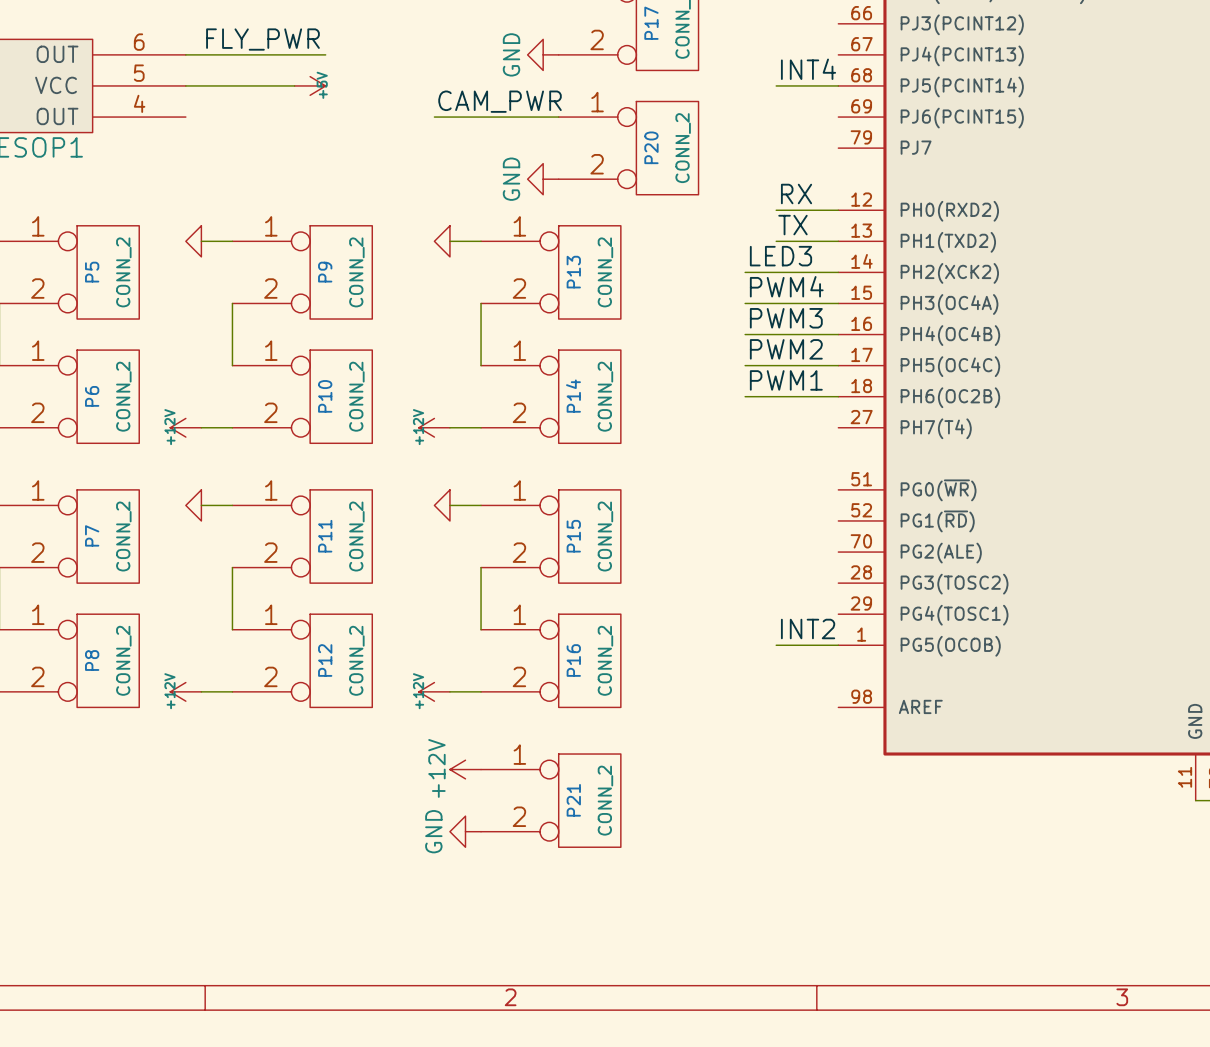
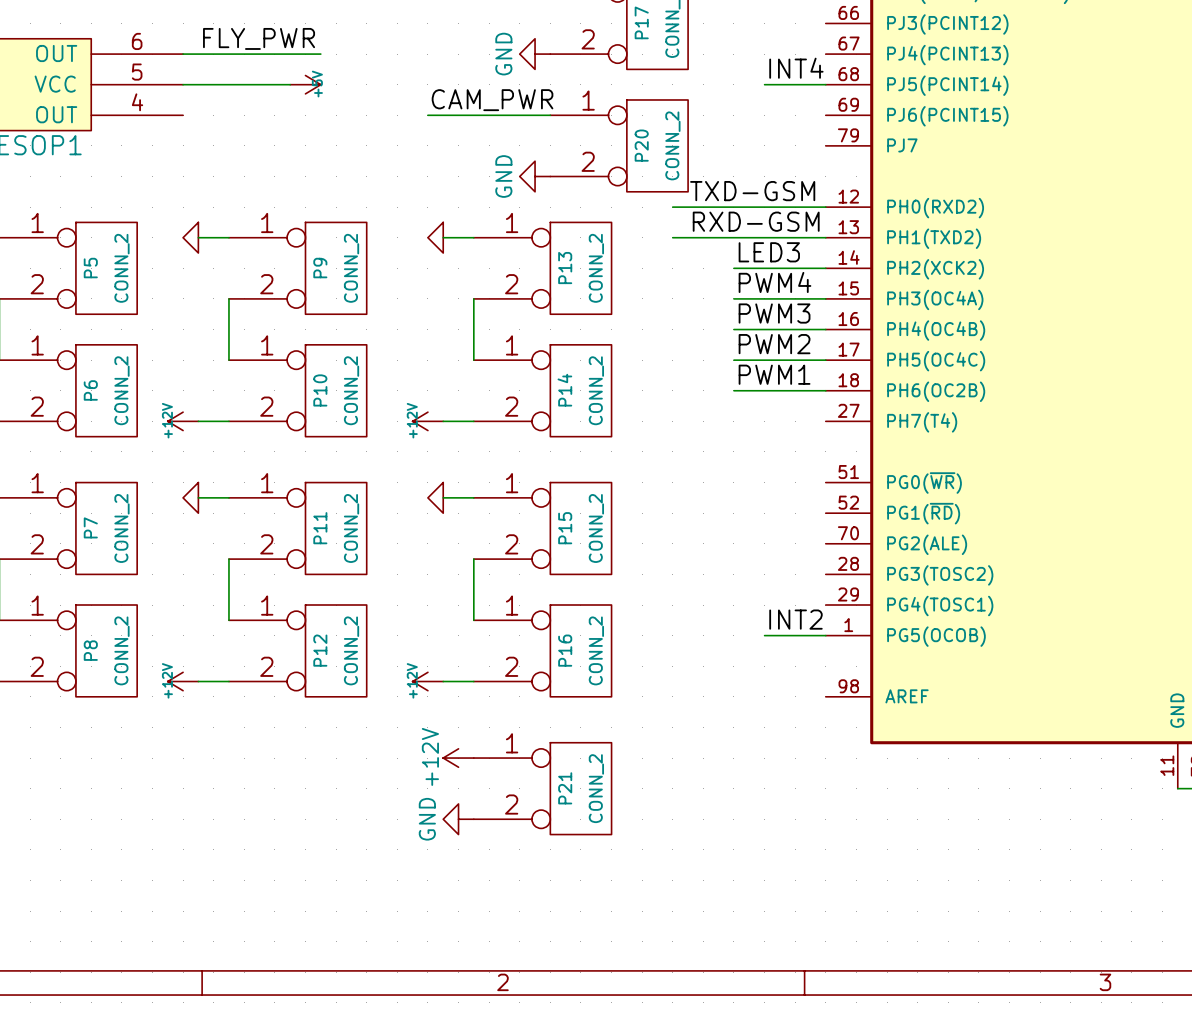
label: none -> TXD-GSM (752, 191)
label: RX (796, 193) -> none
wire: none -> (672, 207) (764, 207)
label: none -> RXD-GSM (756, 221)
label: TX (792, 225) -> none
wire: none -> (672, 237) (764, 237)

